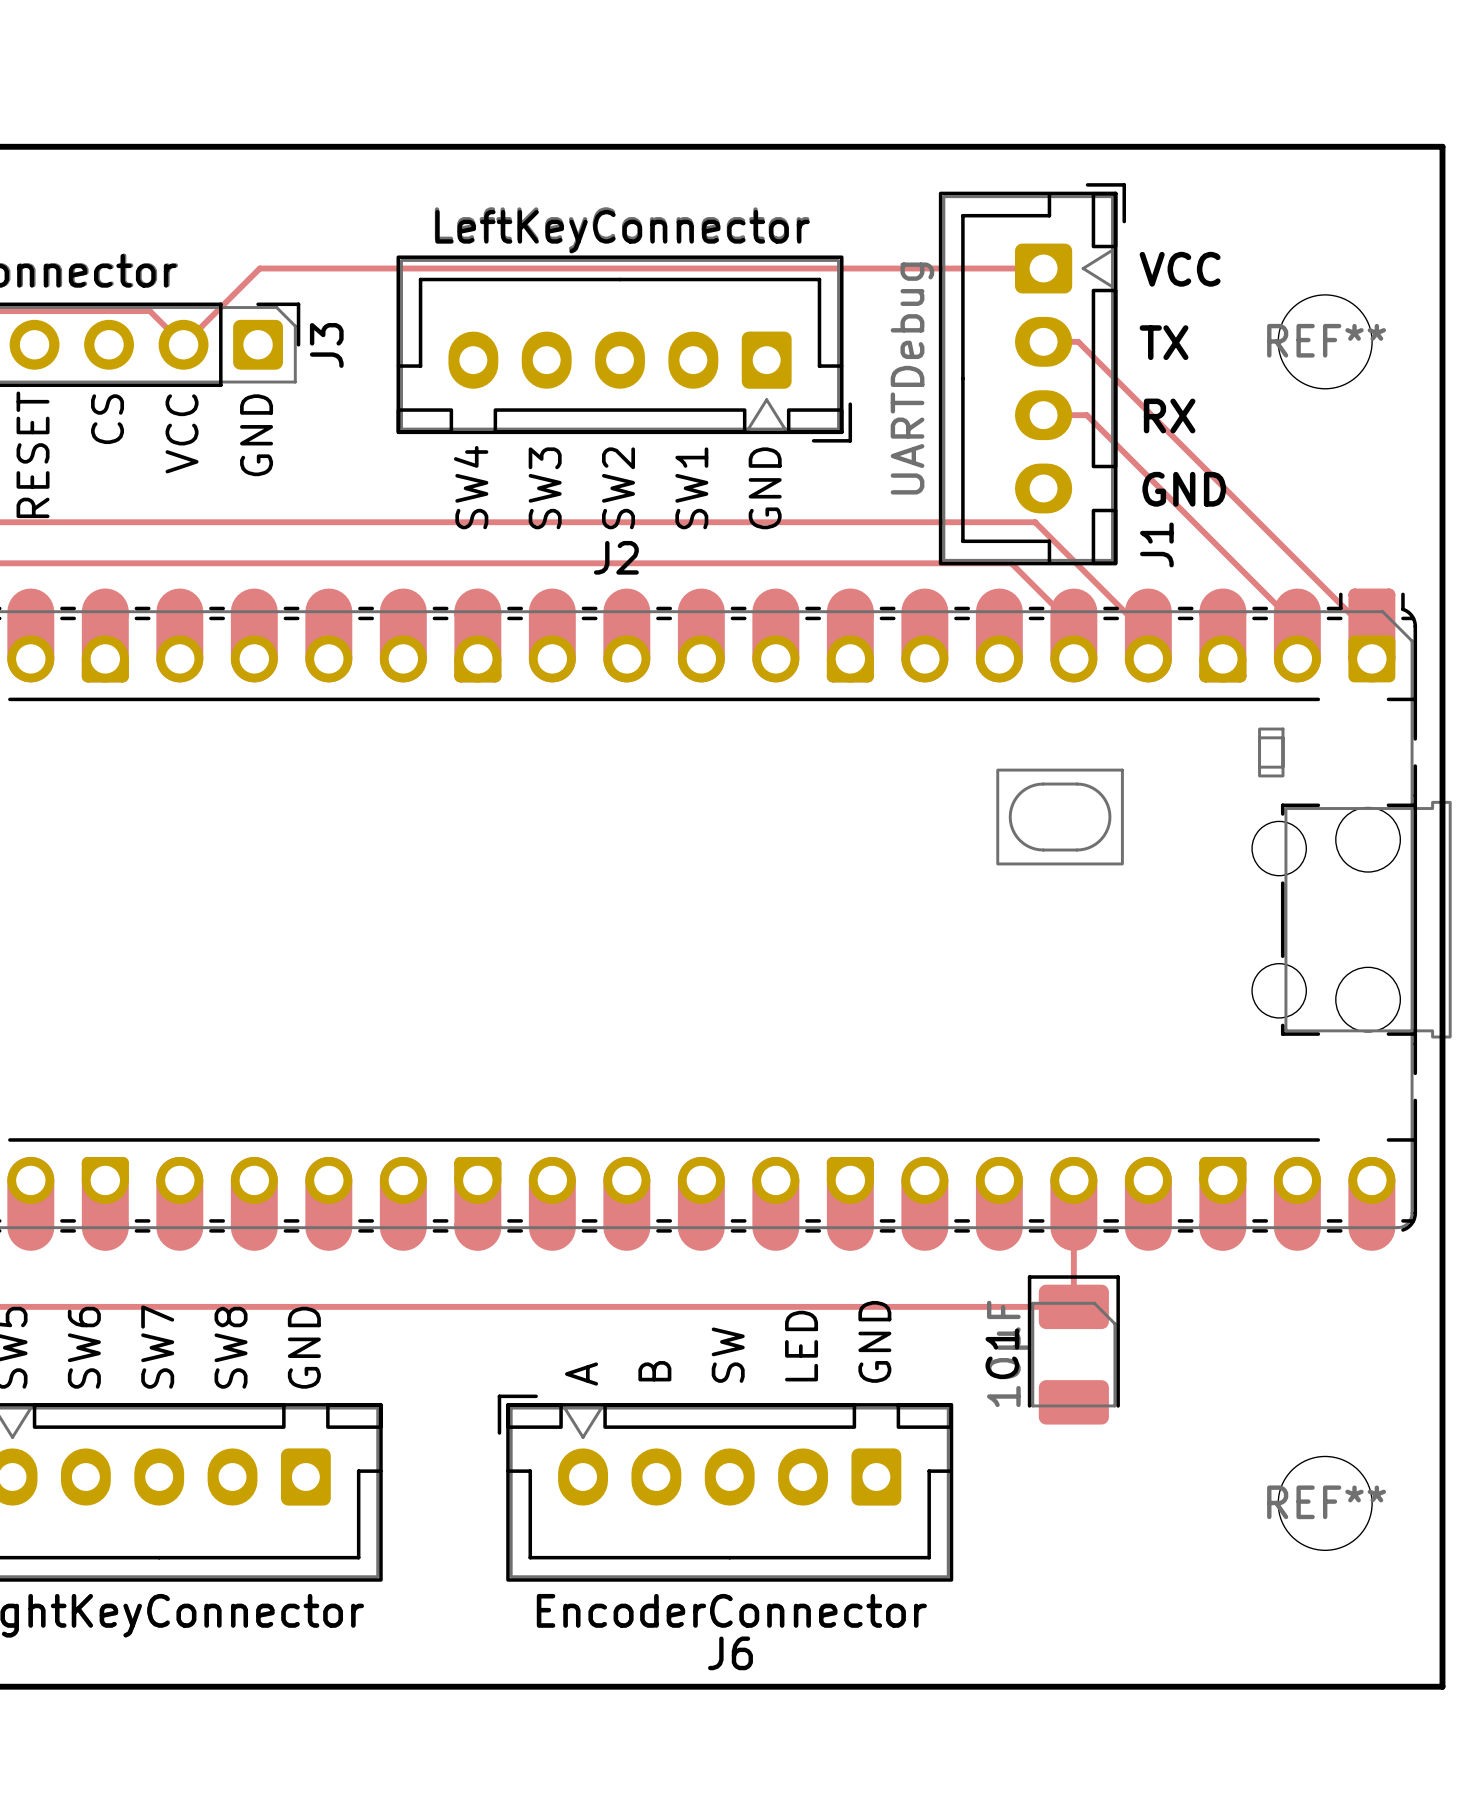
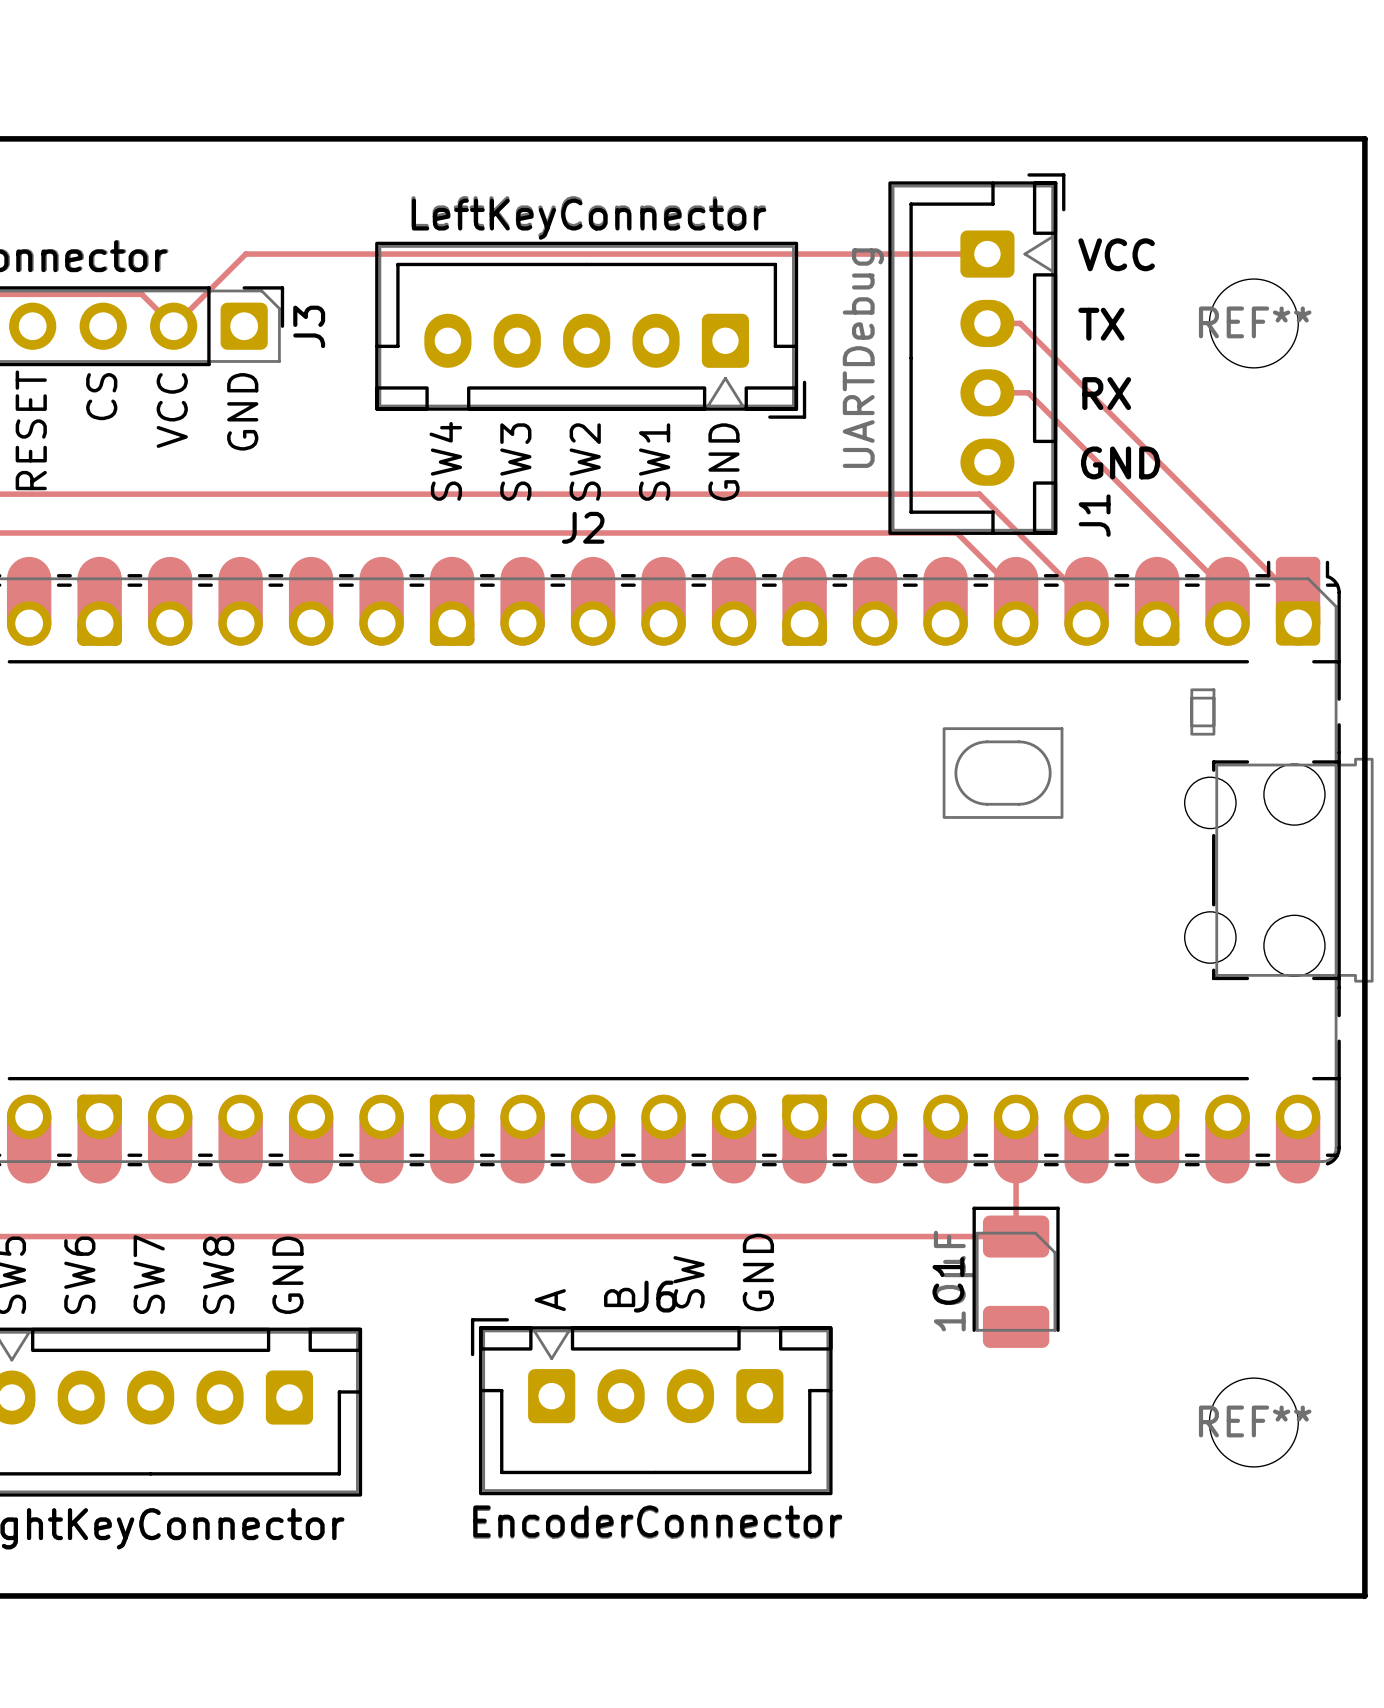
text: GND (874, 1341) -> none
text: LED (801, 1346) -> GND (758, 1272)
J6 footprint: [497, 1394, 954, 1582] -> [470, 1318, 833, 1496]
text position: EncoderConnector (731, 1610) -> EncoderConnector (657, 1521)
J6 name position: J6 (730, 1653) -> J6 (655, 1296)

